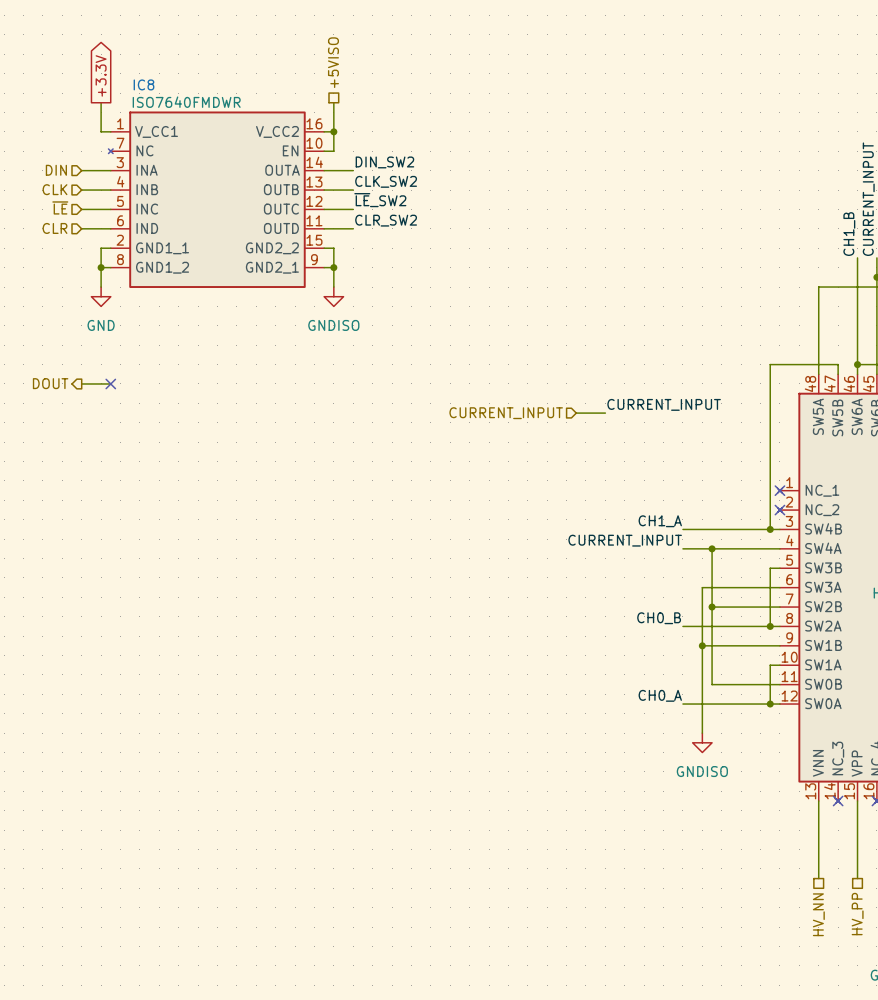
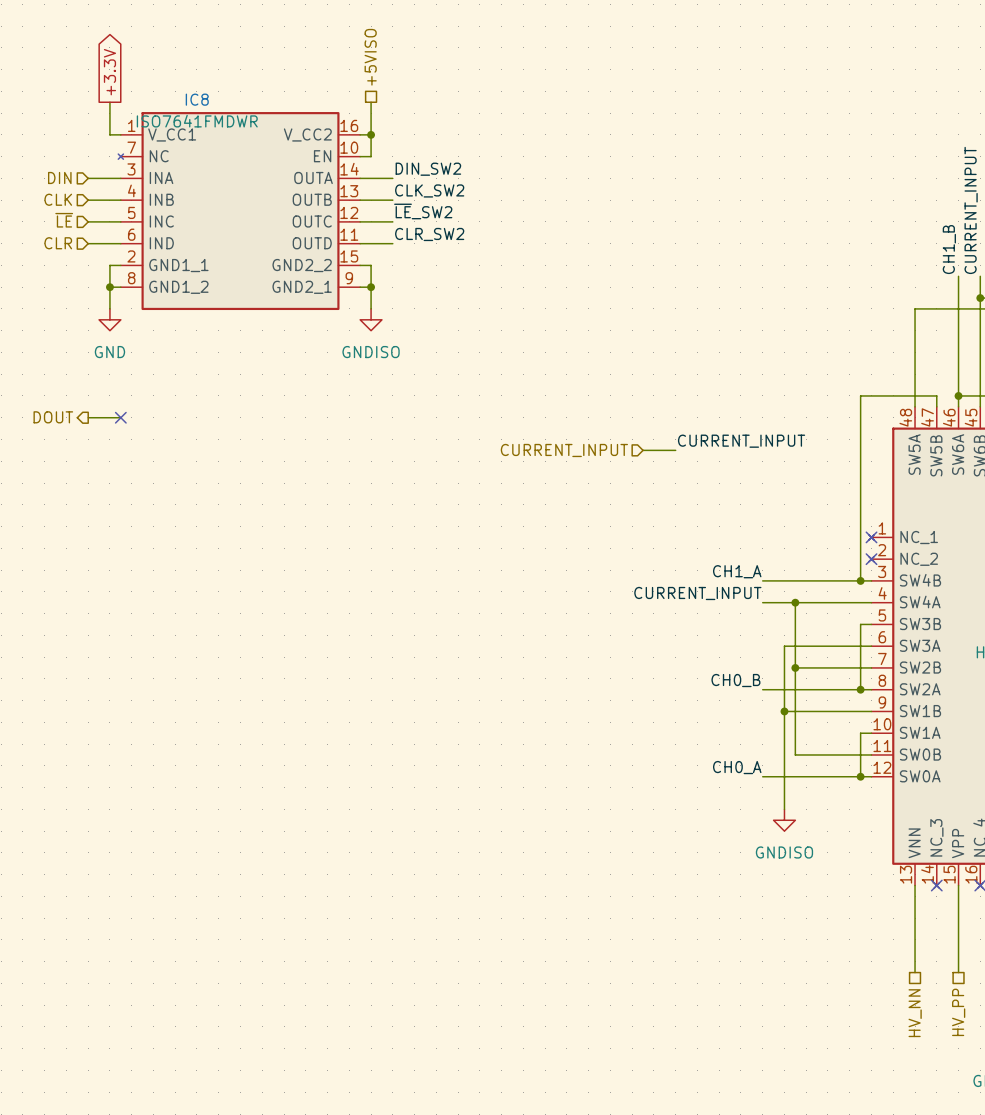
IC8 name position: IC8 (143, 84) -> IC8 (197, 99)
IC8 value: ISO7640FMDWR (186, 102) -> ISO7641FMDWR (197, 121)

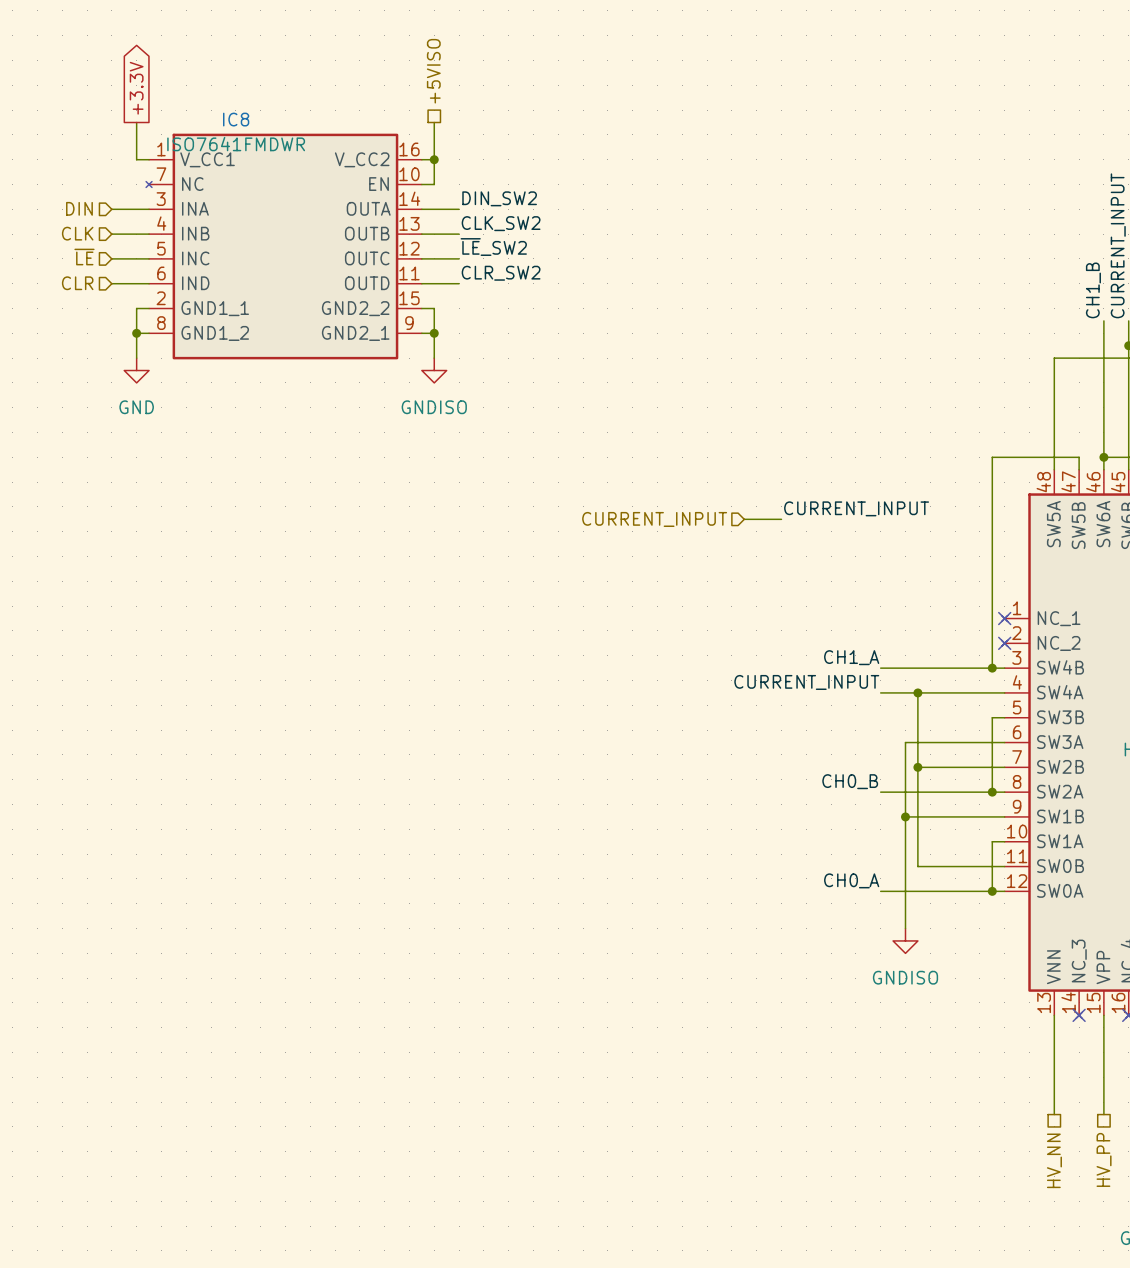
hierarchical label: DOUT (53, 417) -> none
wire: (88, 417) (120, 417) -> none
no-connect mark: (120, 417) -> none

